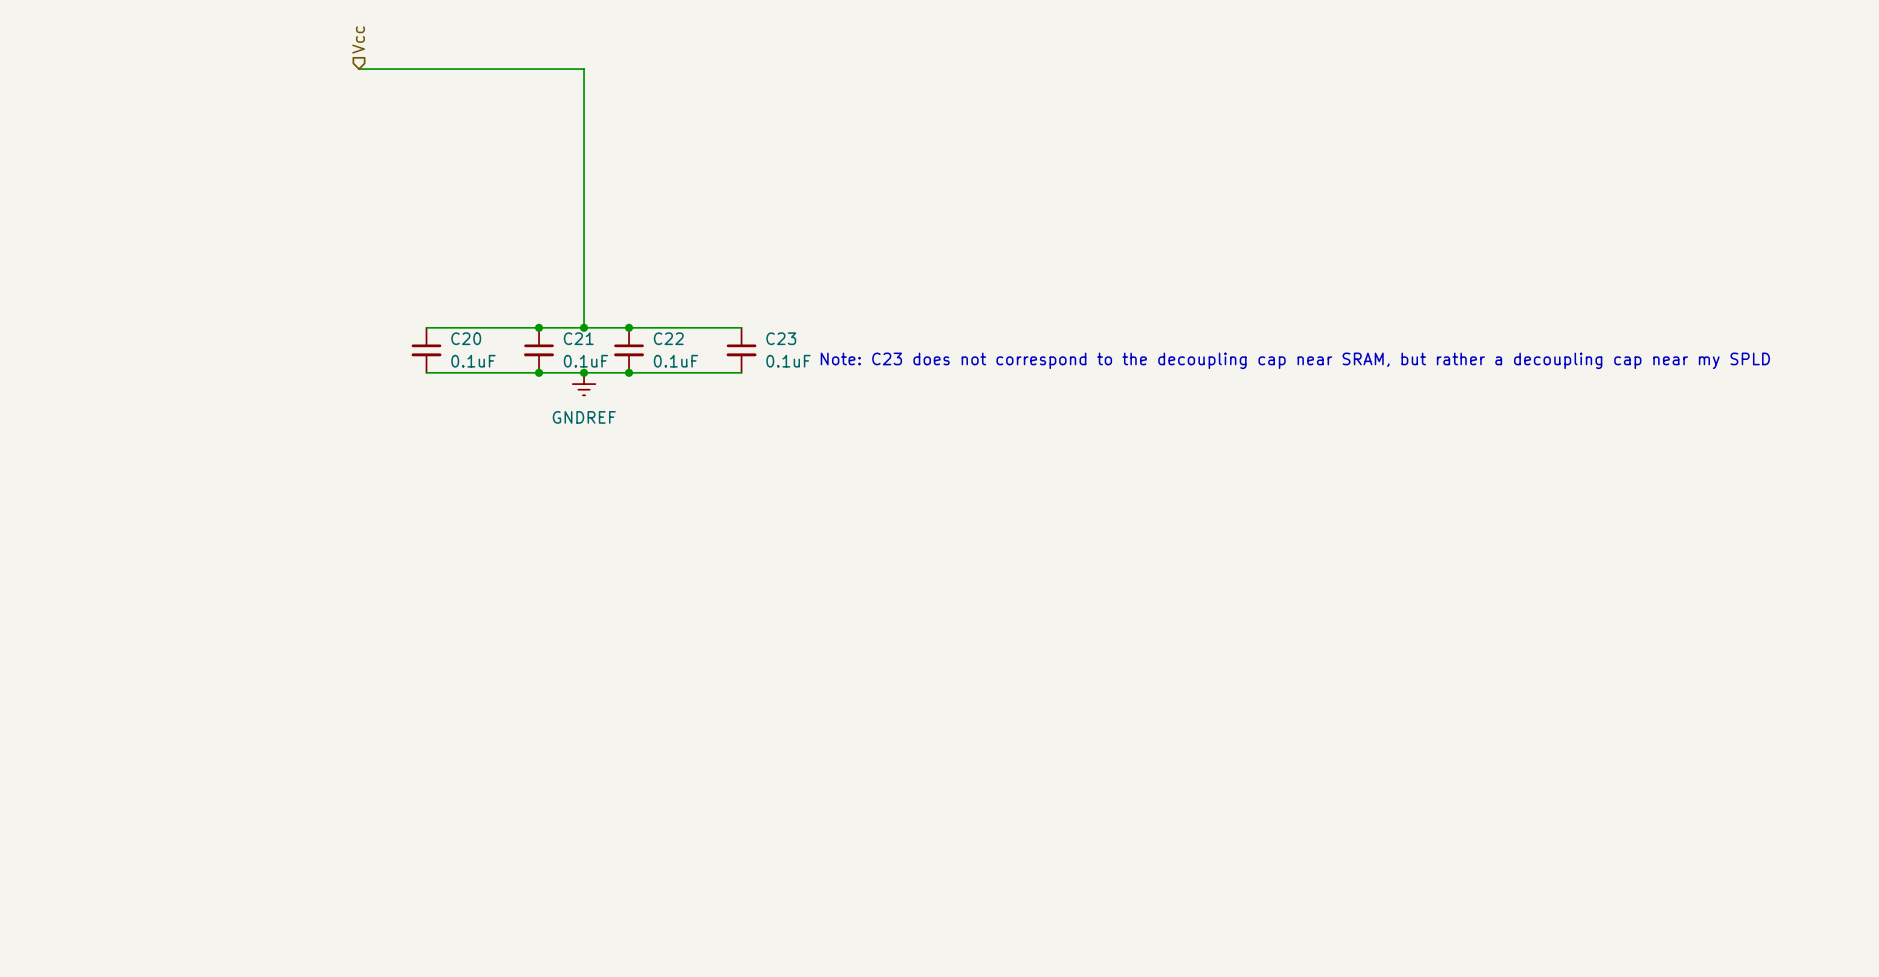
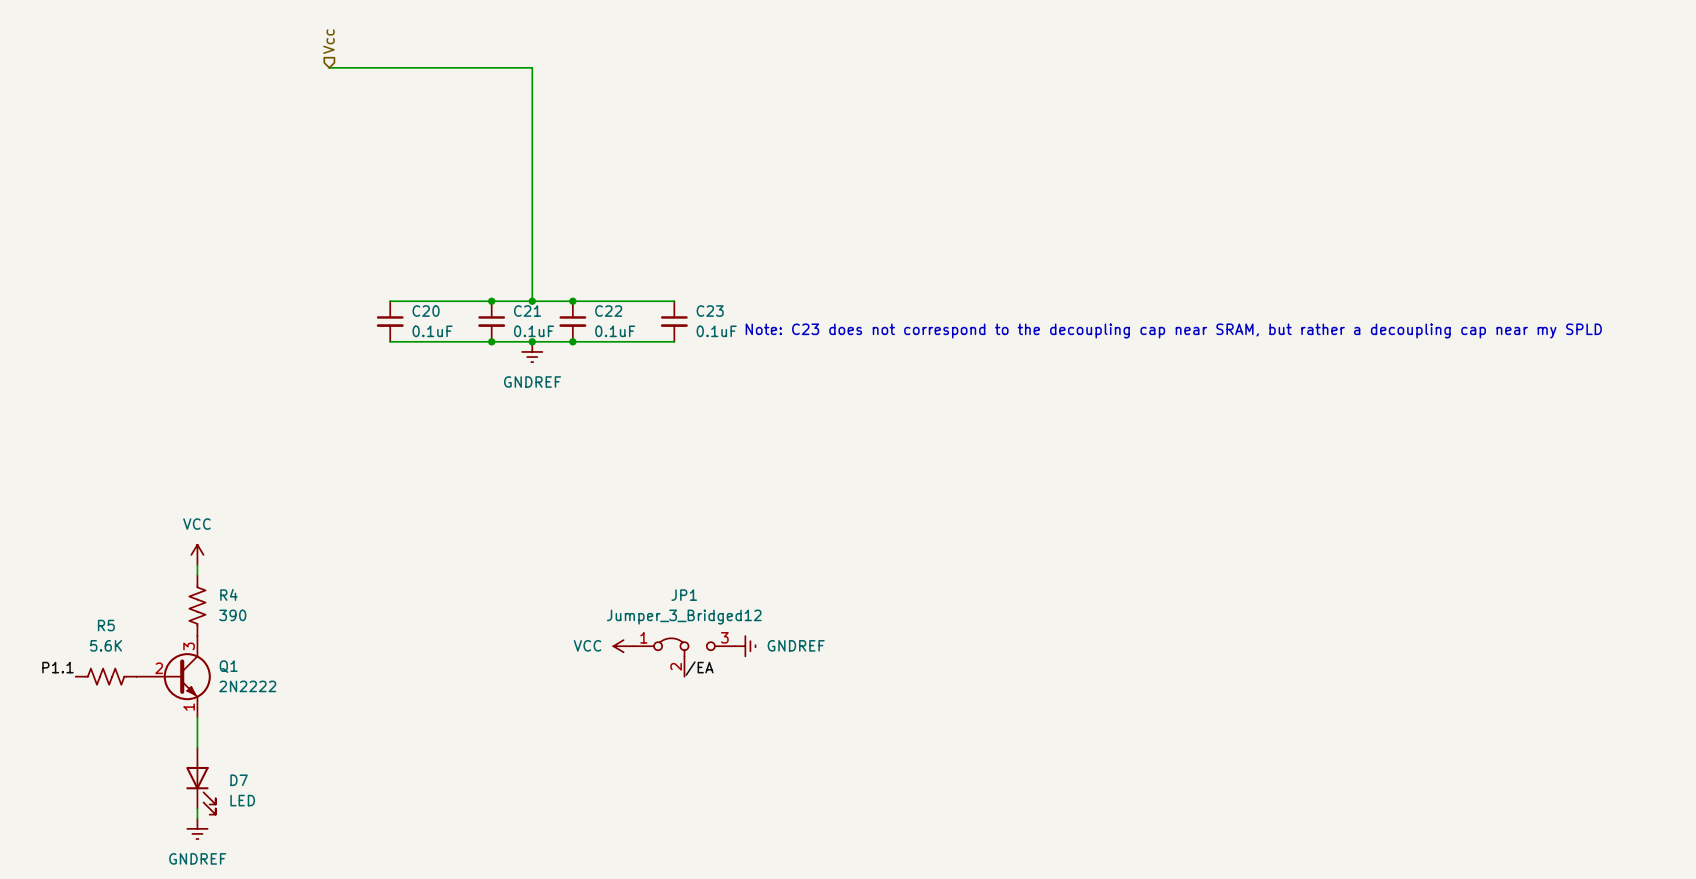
power symbol: none -> VCC (197, 554)
wire: none -> (197, 565) (197, 575)
R4: none -> 390 (197, 605)
power symbol: none -> VCC (623, 646)
power symbol: none -> GNDREF (745, 646)
JP1: none -> Jumper_3_Bridged12 (684, 657)
label: none -> P1.1 (57, 667)
label: none -> /EA (699, 668)
R5: none -> 5.6K (106, 676)
Q1: none -> 2N2222 (173, 676)
wire: none -> (197, 717) (197, 747)
D7: none -> LED (200, 781)
wire: none -> (197, 808) (197, 818)
power symbol: none -> GNDREF (197, 828)

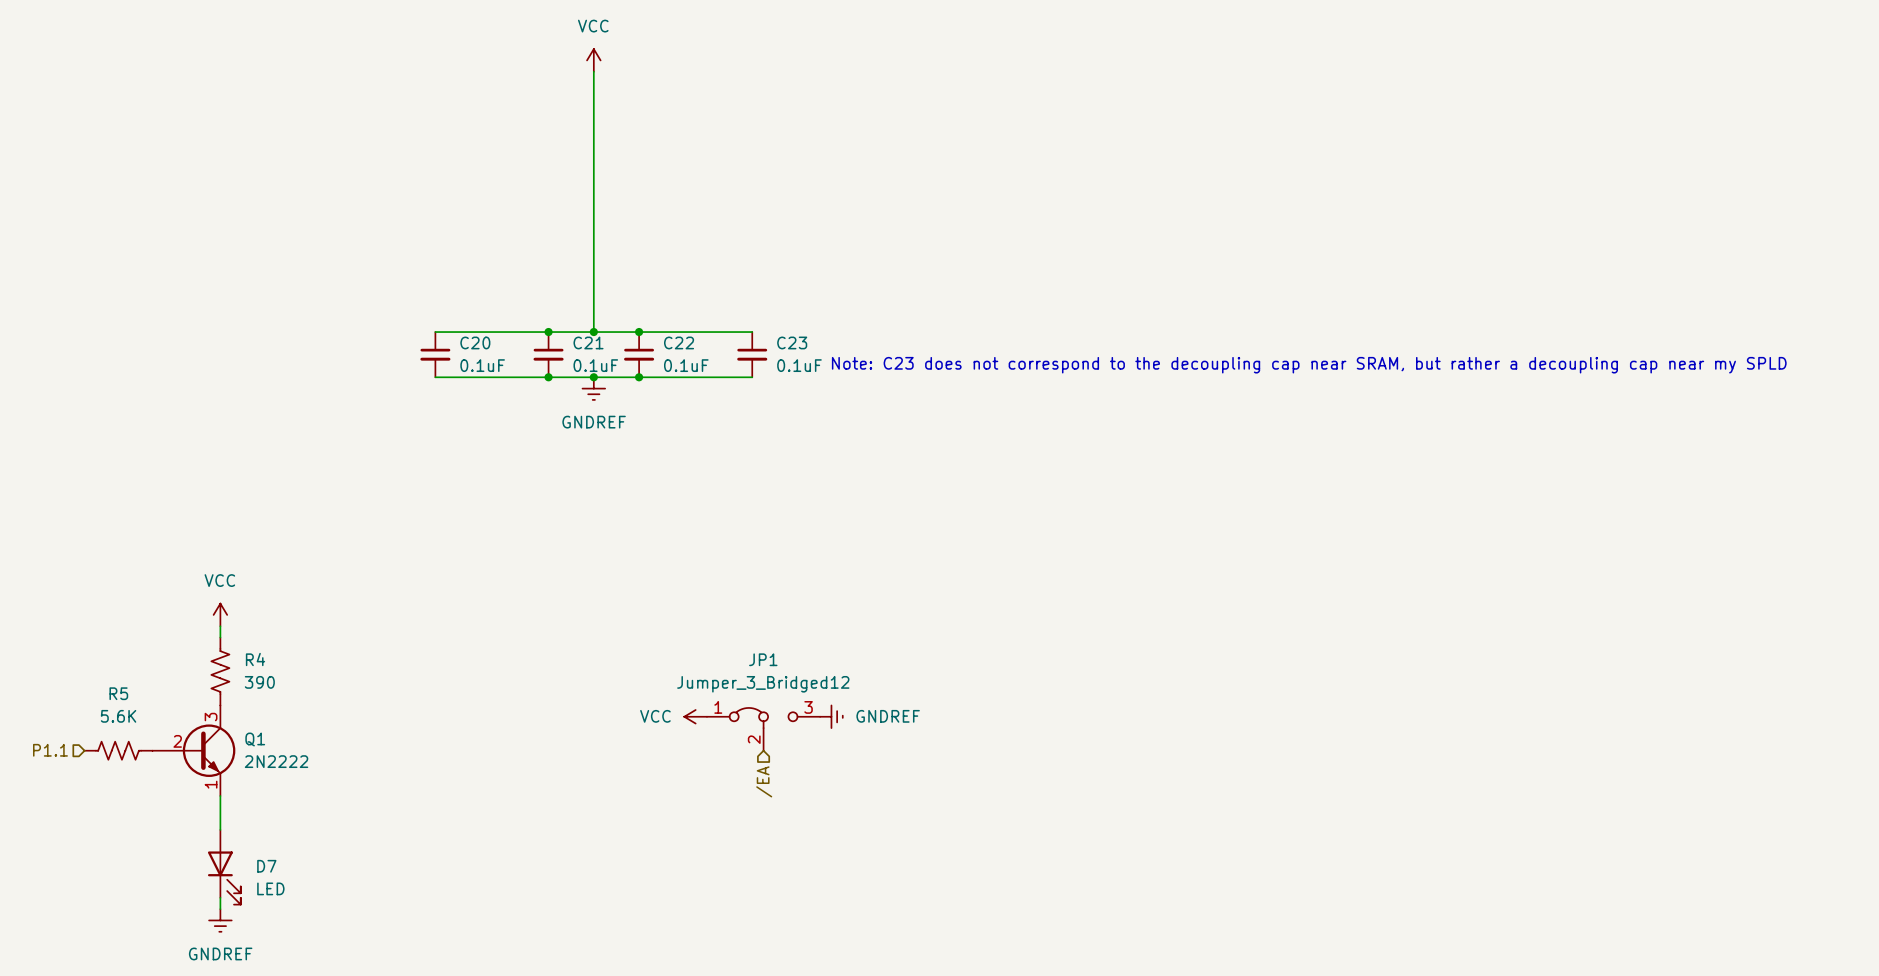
hierarchical label: Vcc (328, 41) -> none
power symbol: none -> VCC (593, 60)
wire: (329, 67) (532, 67) -> none
label: P1.1 (57, 667) -> none
label: /EA (699, 668) -> none
hierarchical label: none -> P1.1 (50, 750)
hierarchical label: none -> /EA (764, 781)

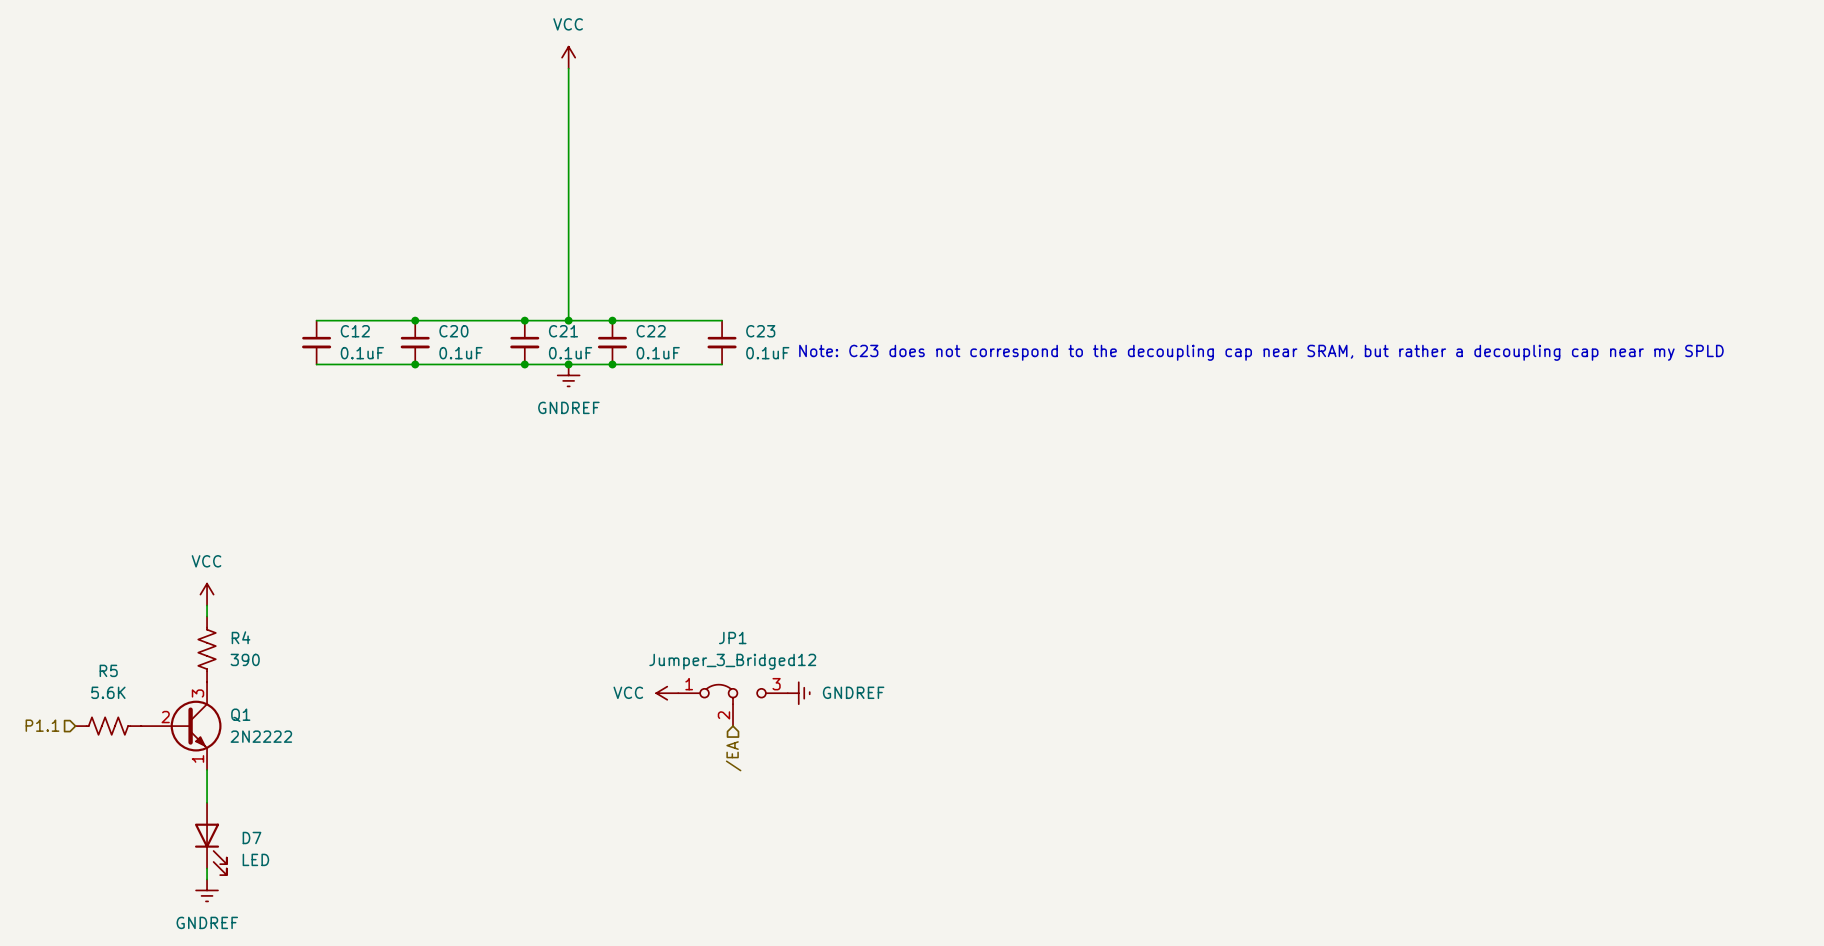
wire: none -> (316, 320) (415, 320)
junction: none -> (415, 320)
C12: none -> 0.1uF (316, 342)
wire: none -> (316, 364) (415, 364)
junction: none -> (415, 364)

